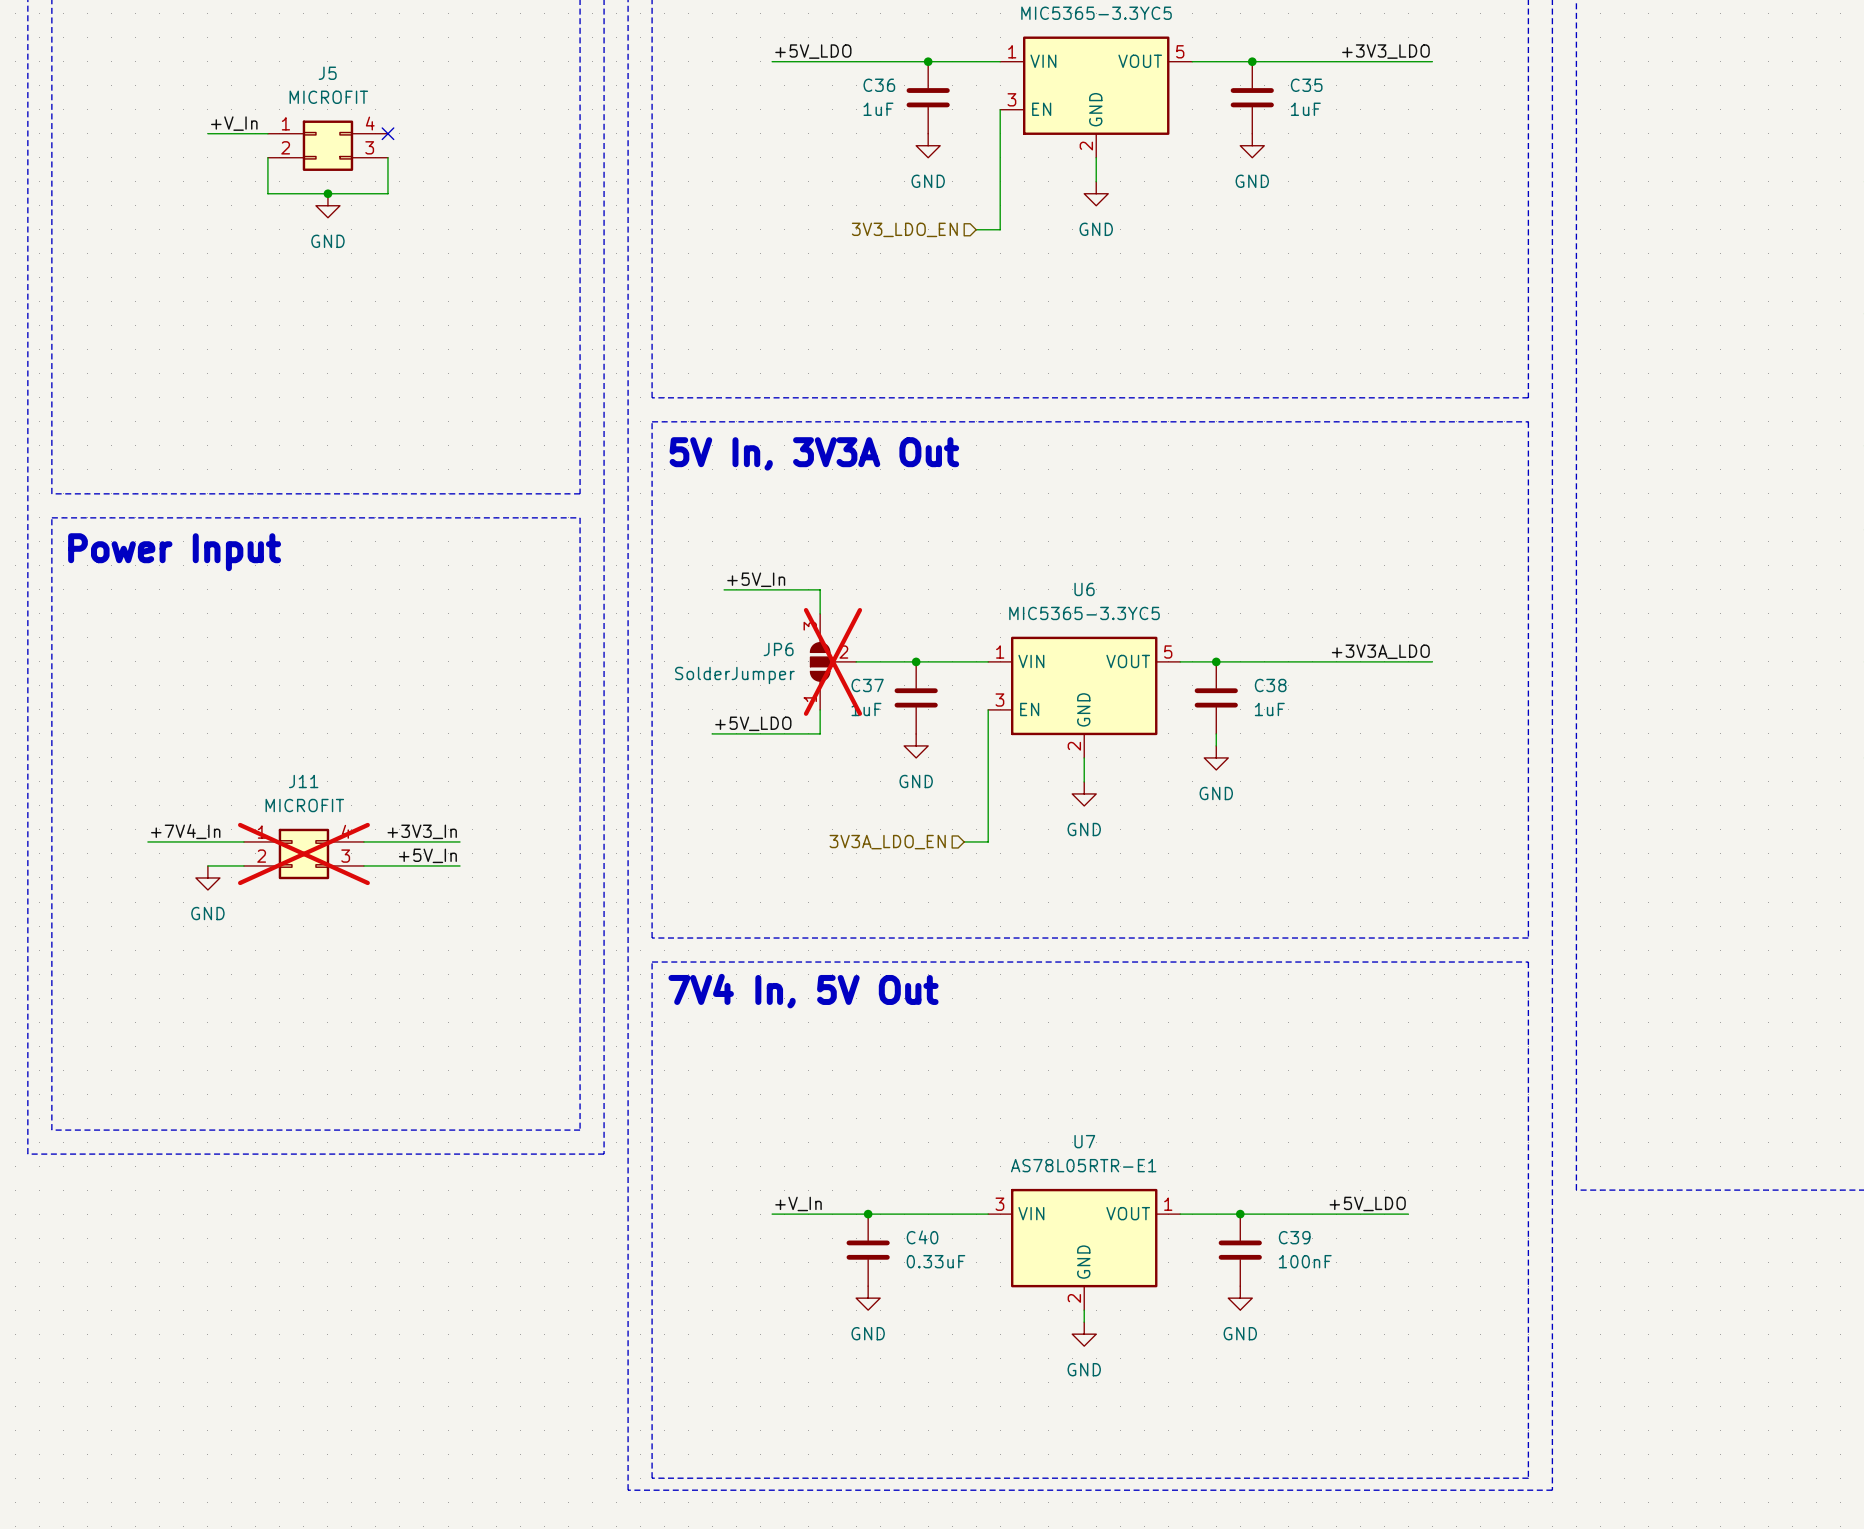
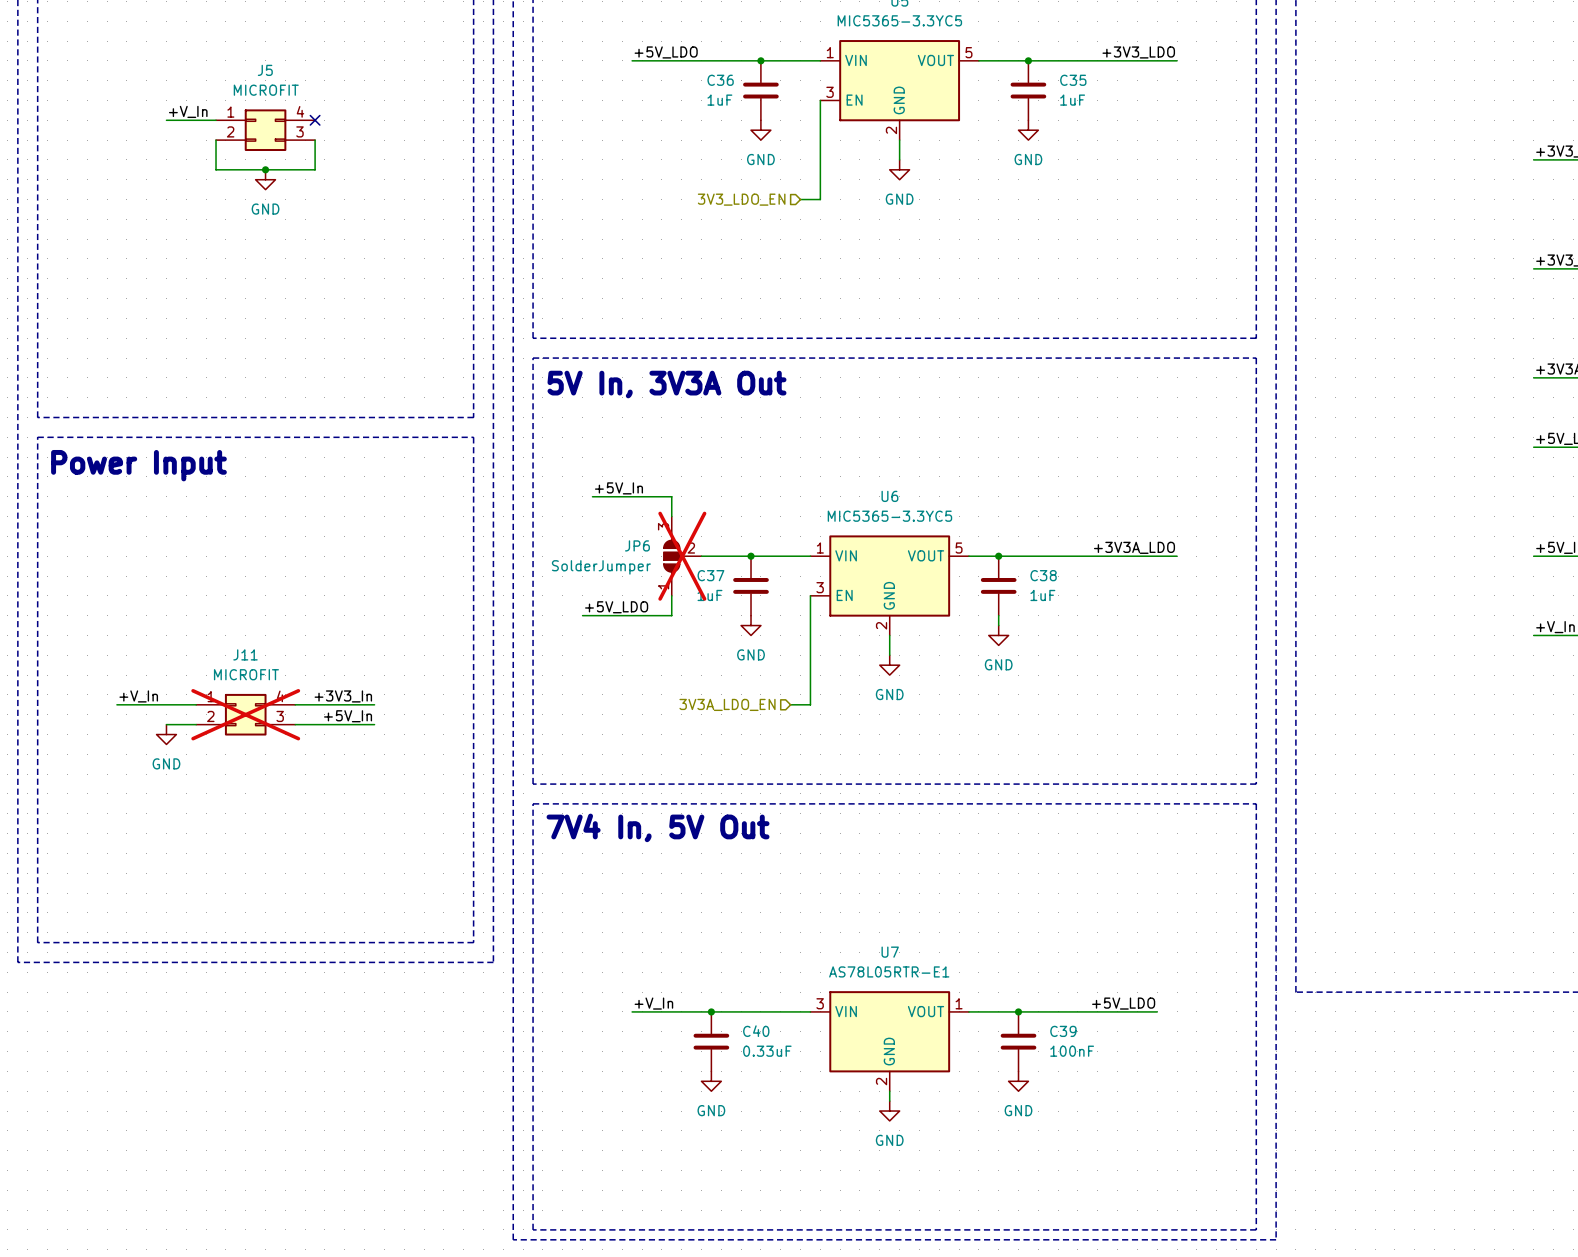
label: +7V4_In (185, 831) -> +V_In (138, 696)

